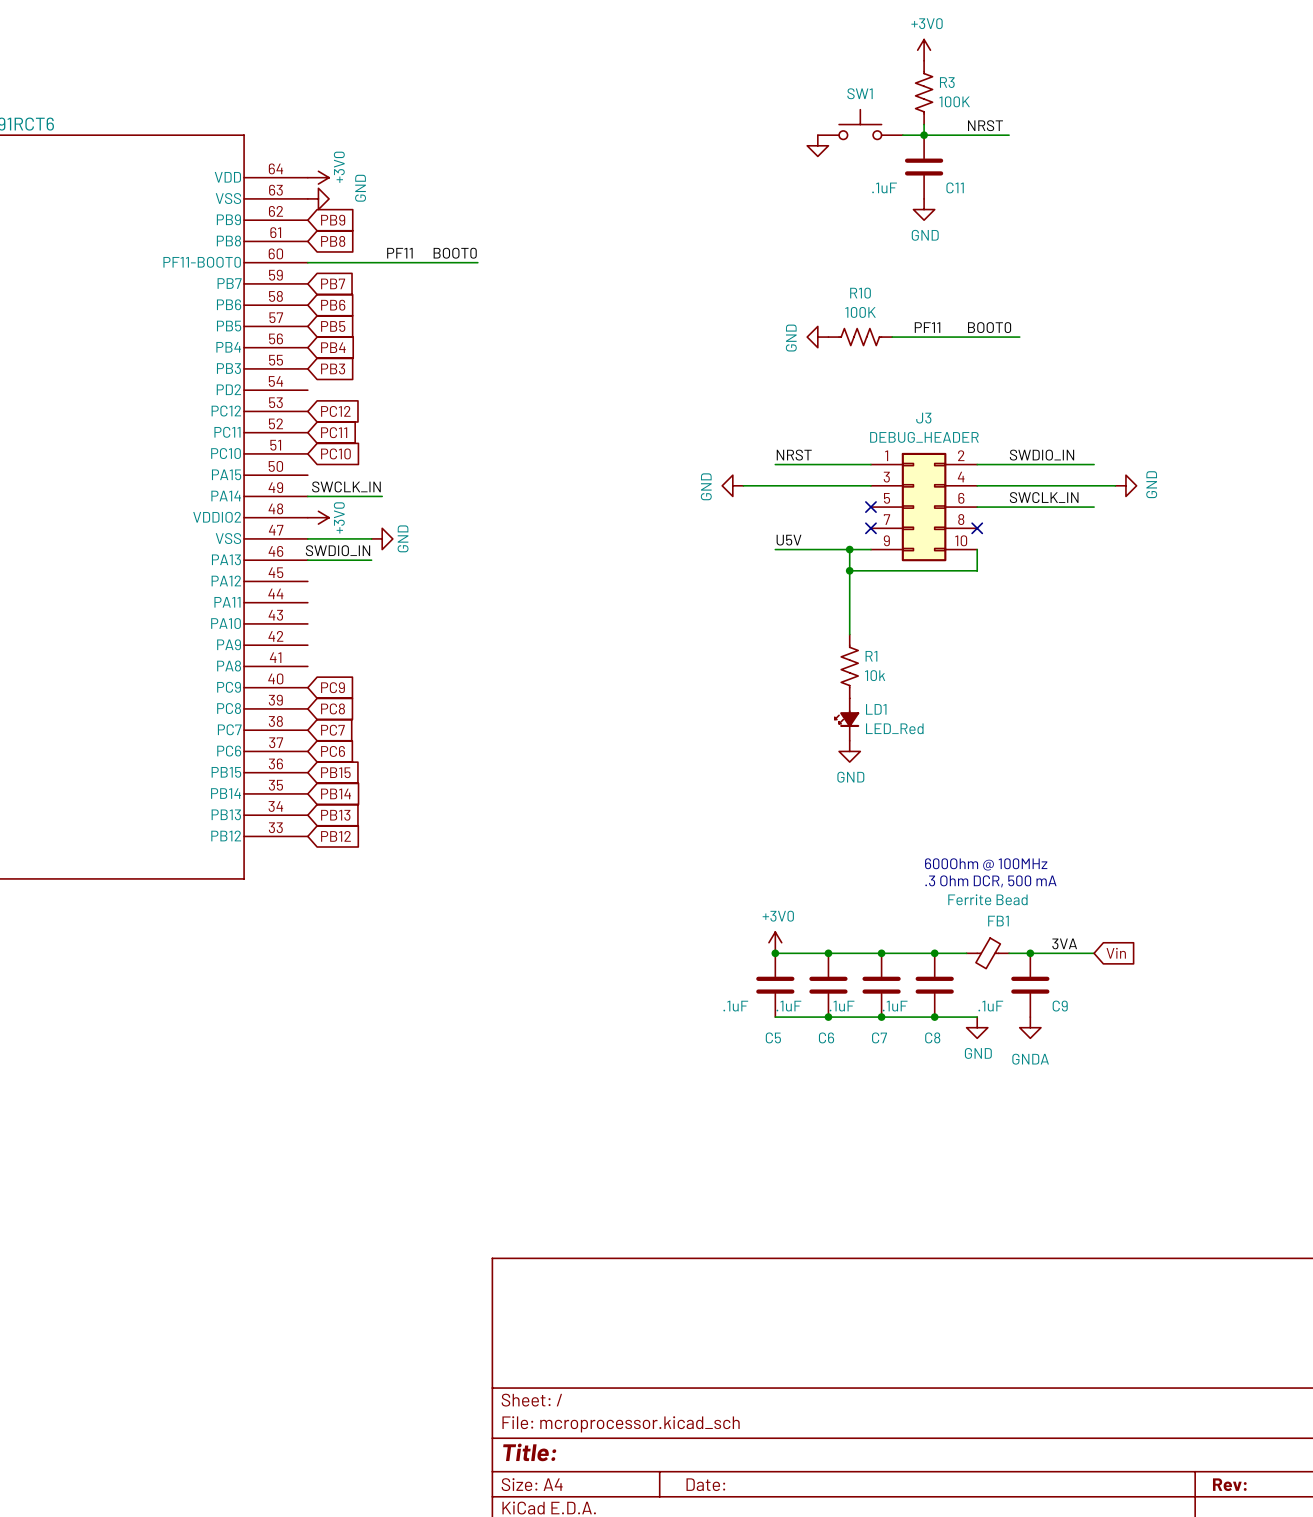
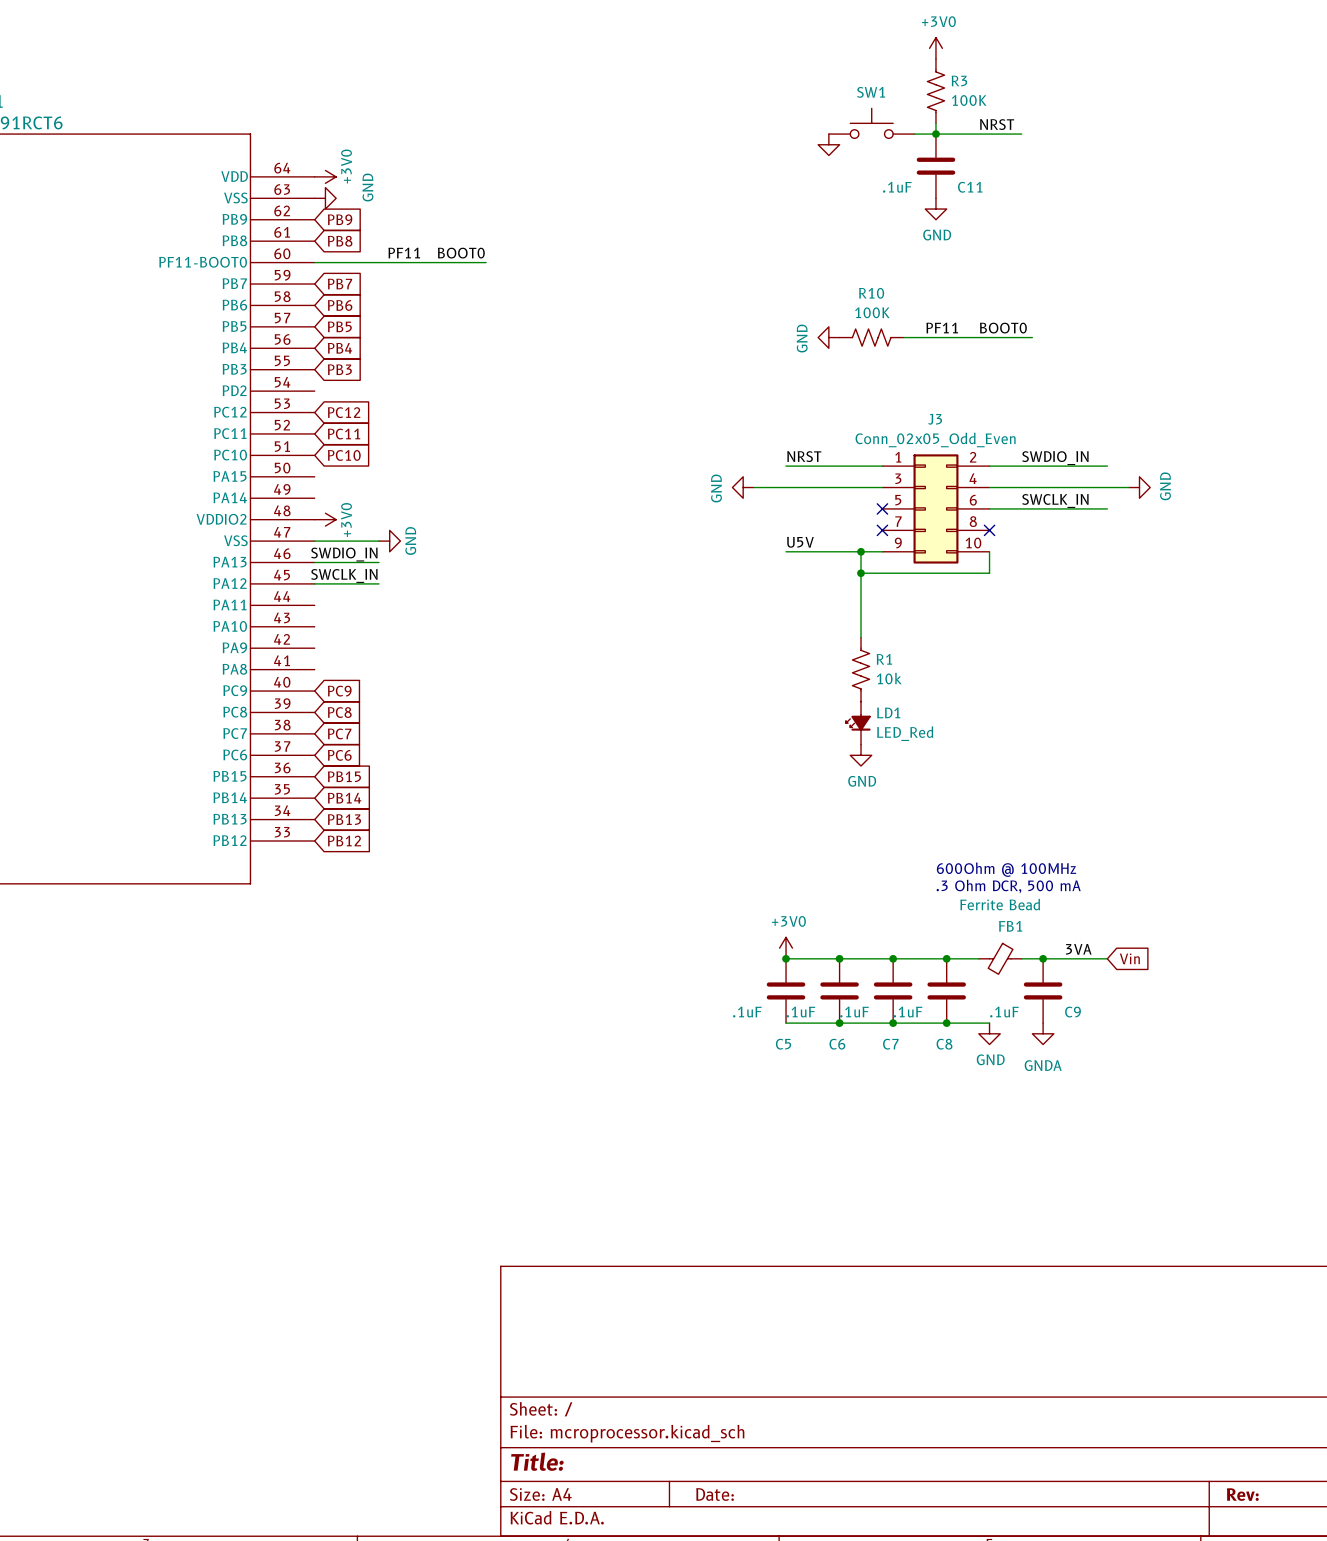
J3 value: DEBUG_HEADER (924, 437) -> Conn_02x05_Odd_Even (935, 439)
label position: SWCLK_IN (346, 486) -> SWCLK_IN (344, 575)
wire: (307, 496) (382, 496) -> none
wire: none -> (314, 583) (378, 583)

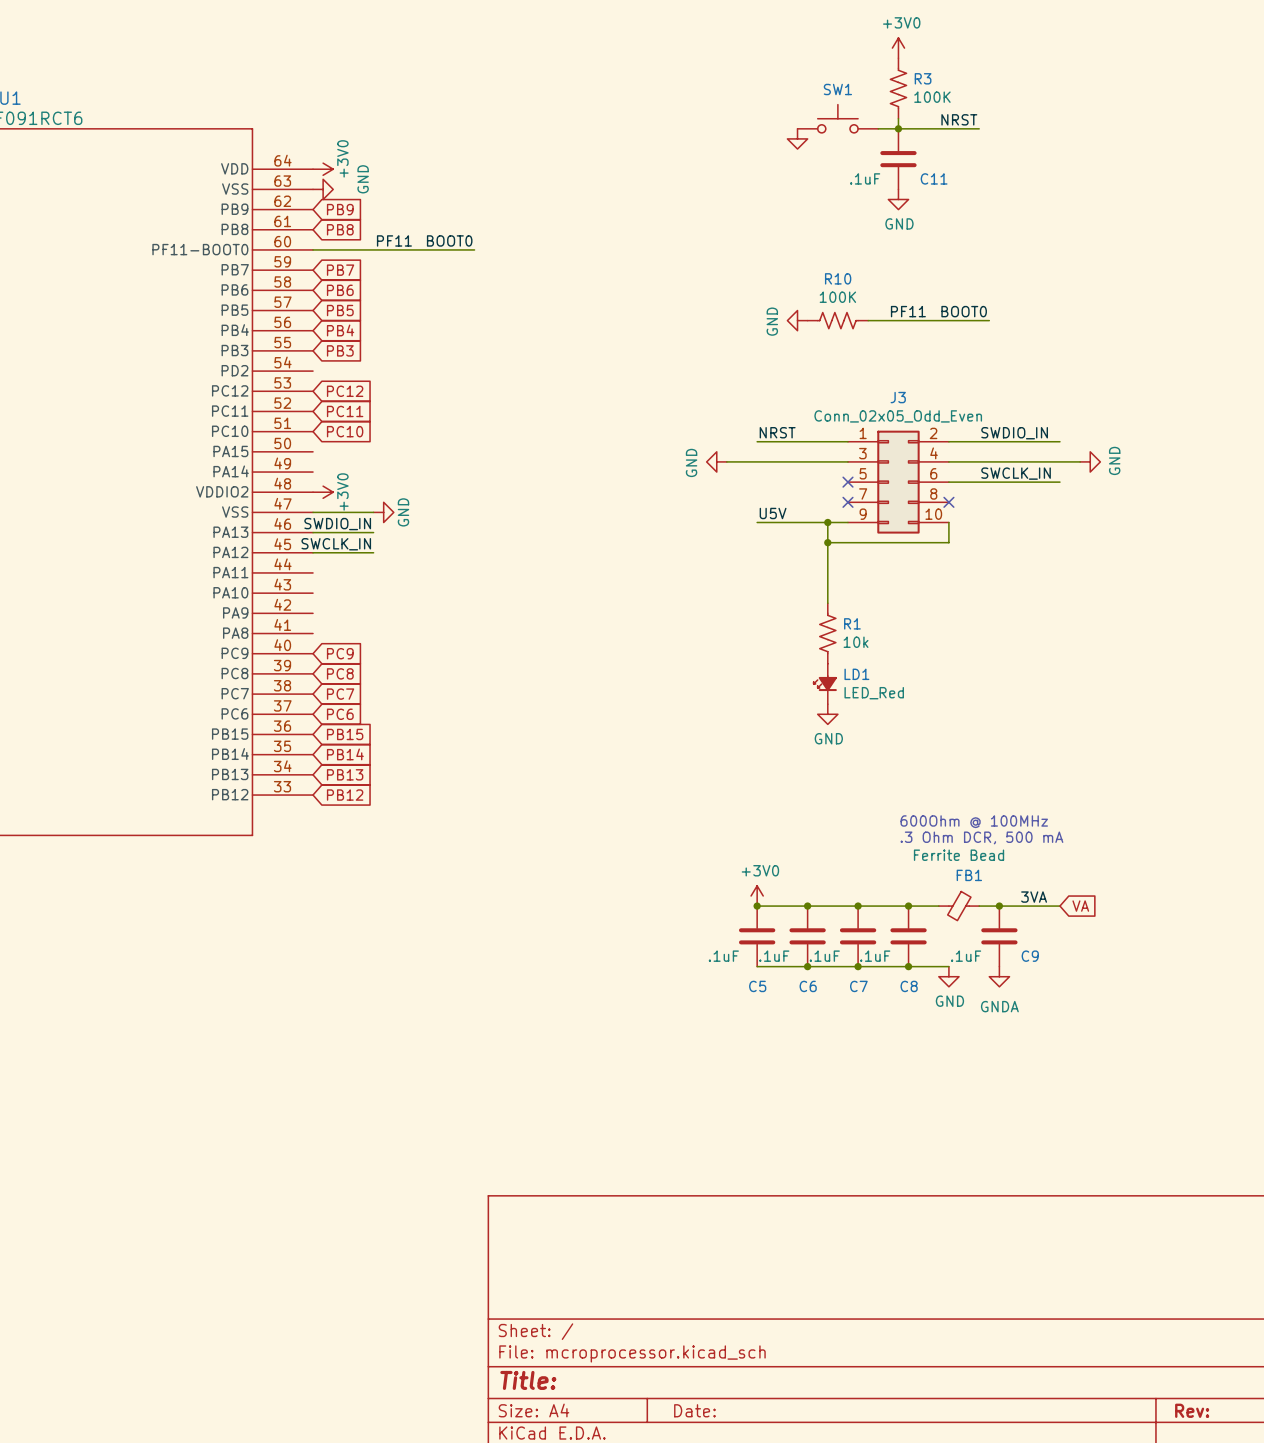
global label: Vin (1129, 958) -> VA (1080, 906)

